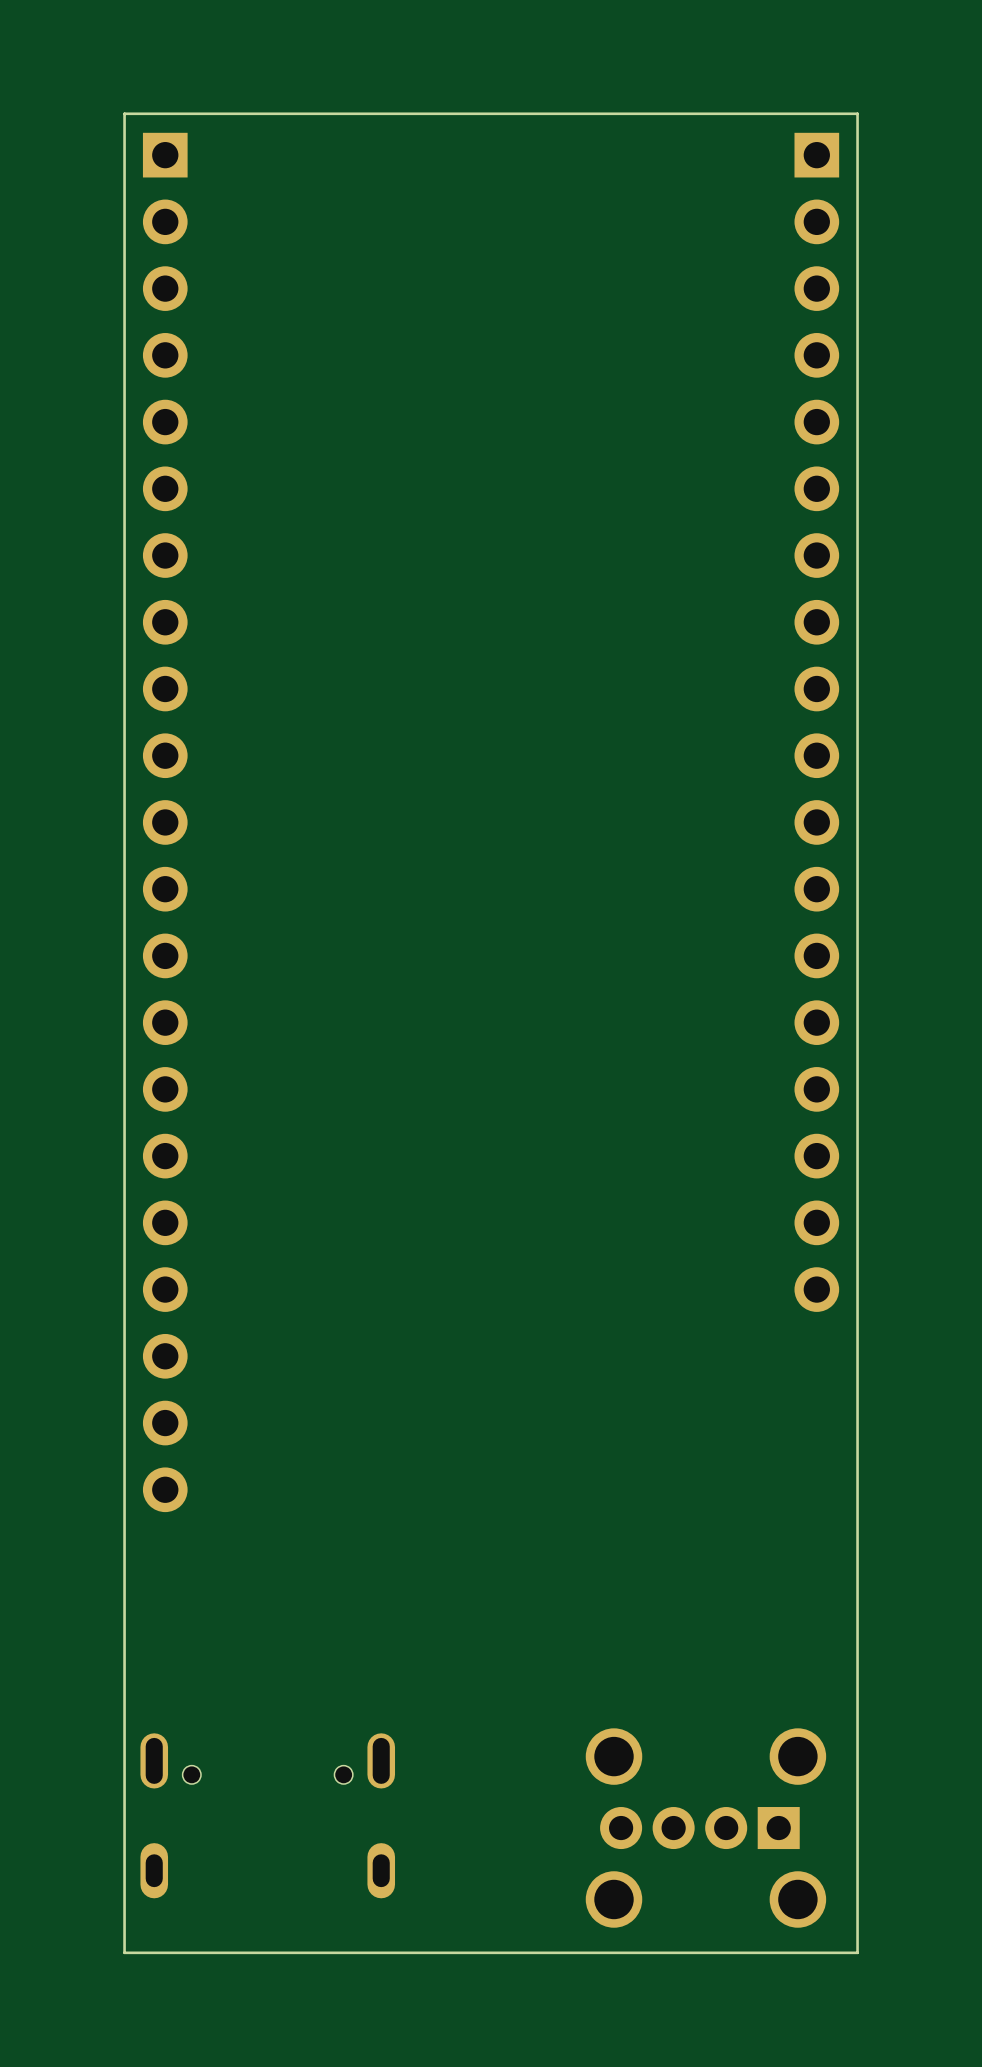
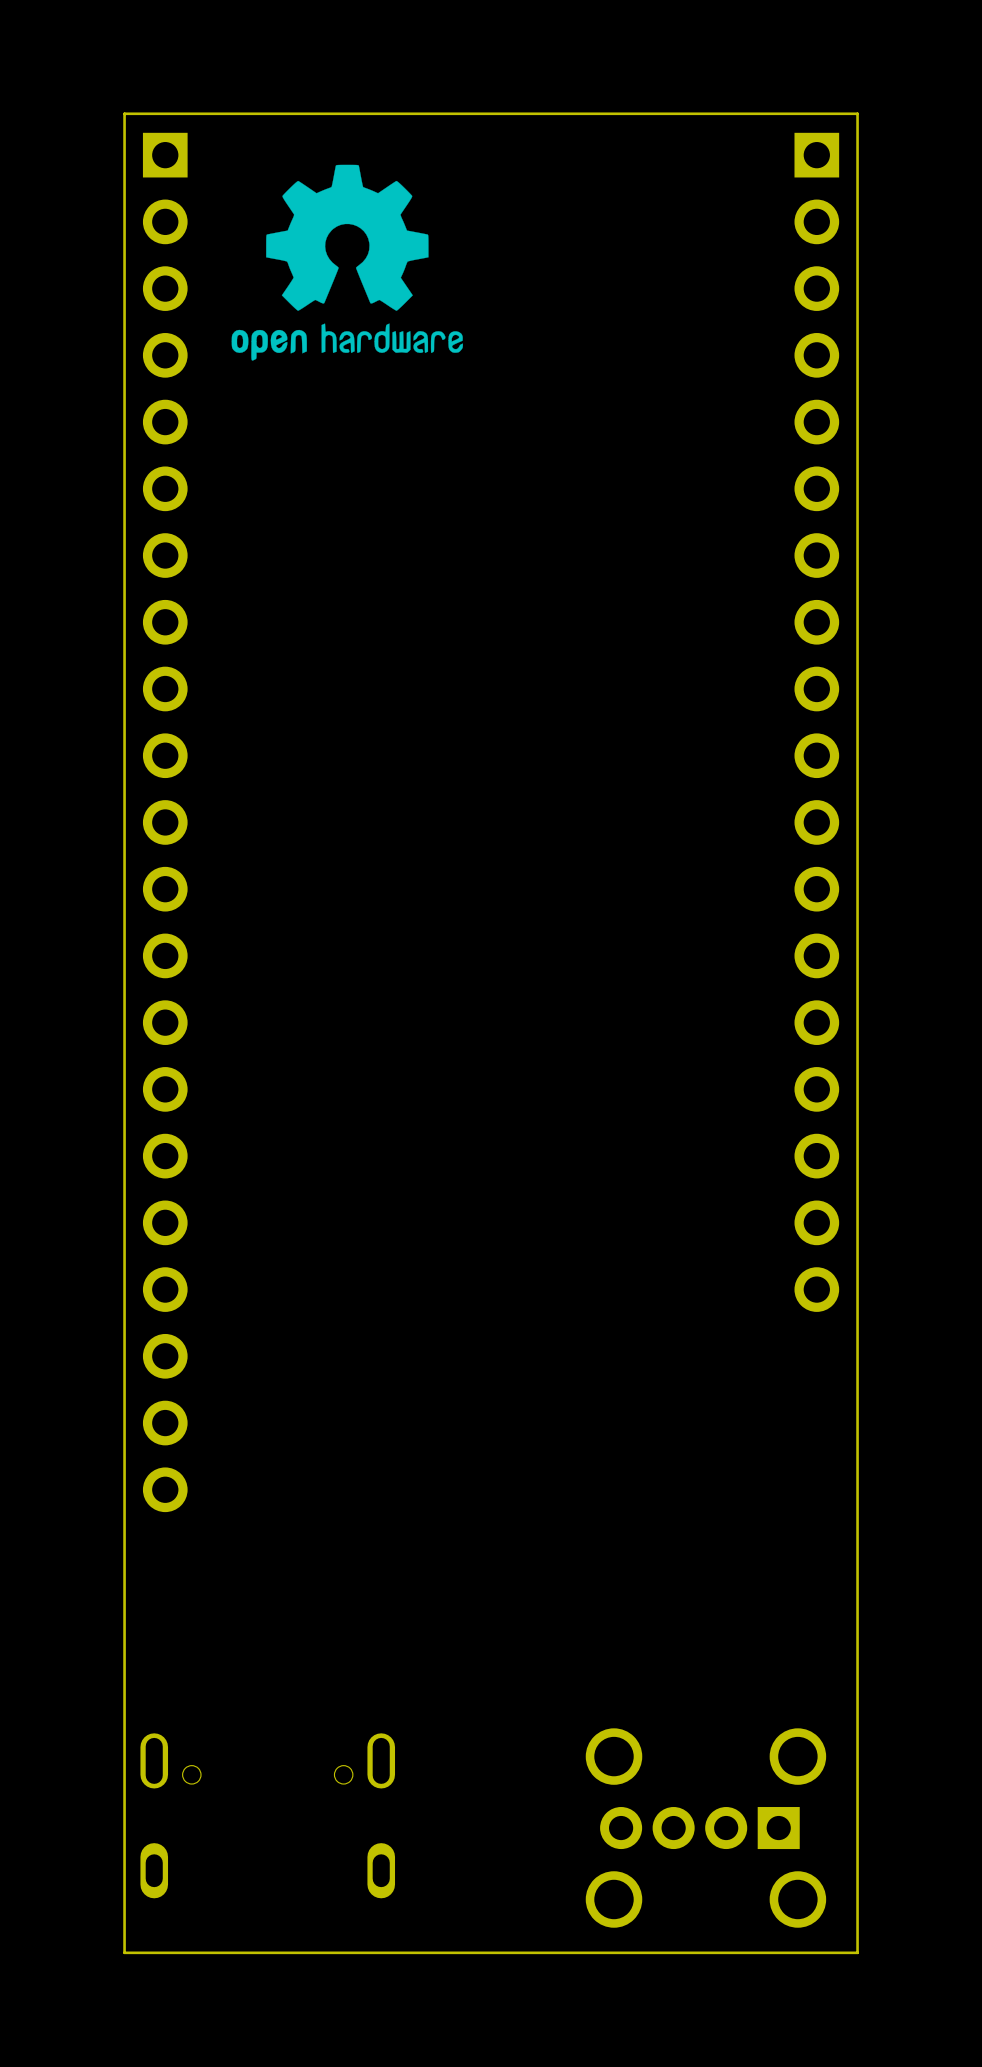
drawing: none -> [231, 164, 463, 361]

